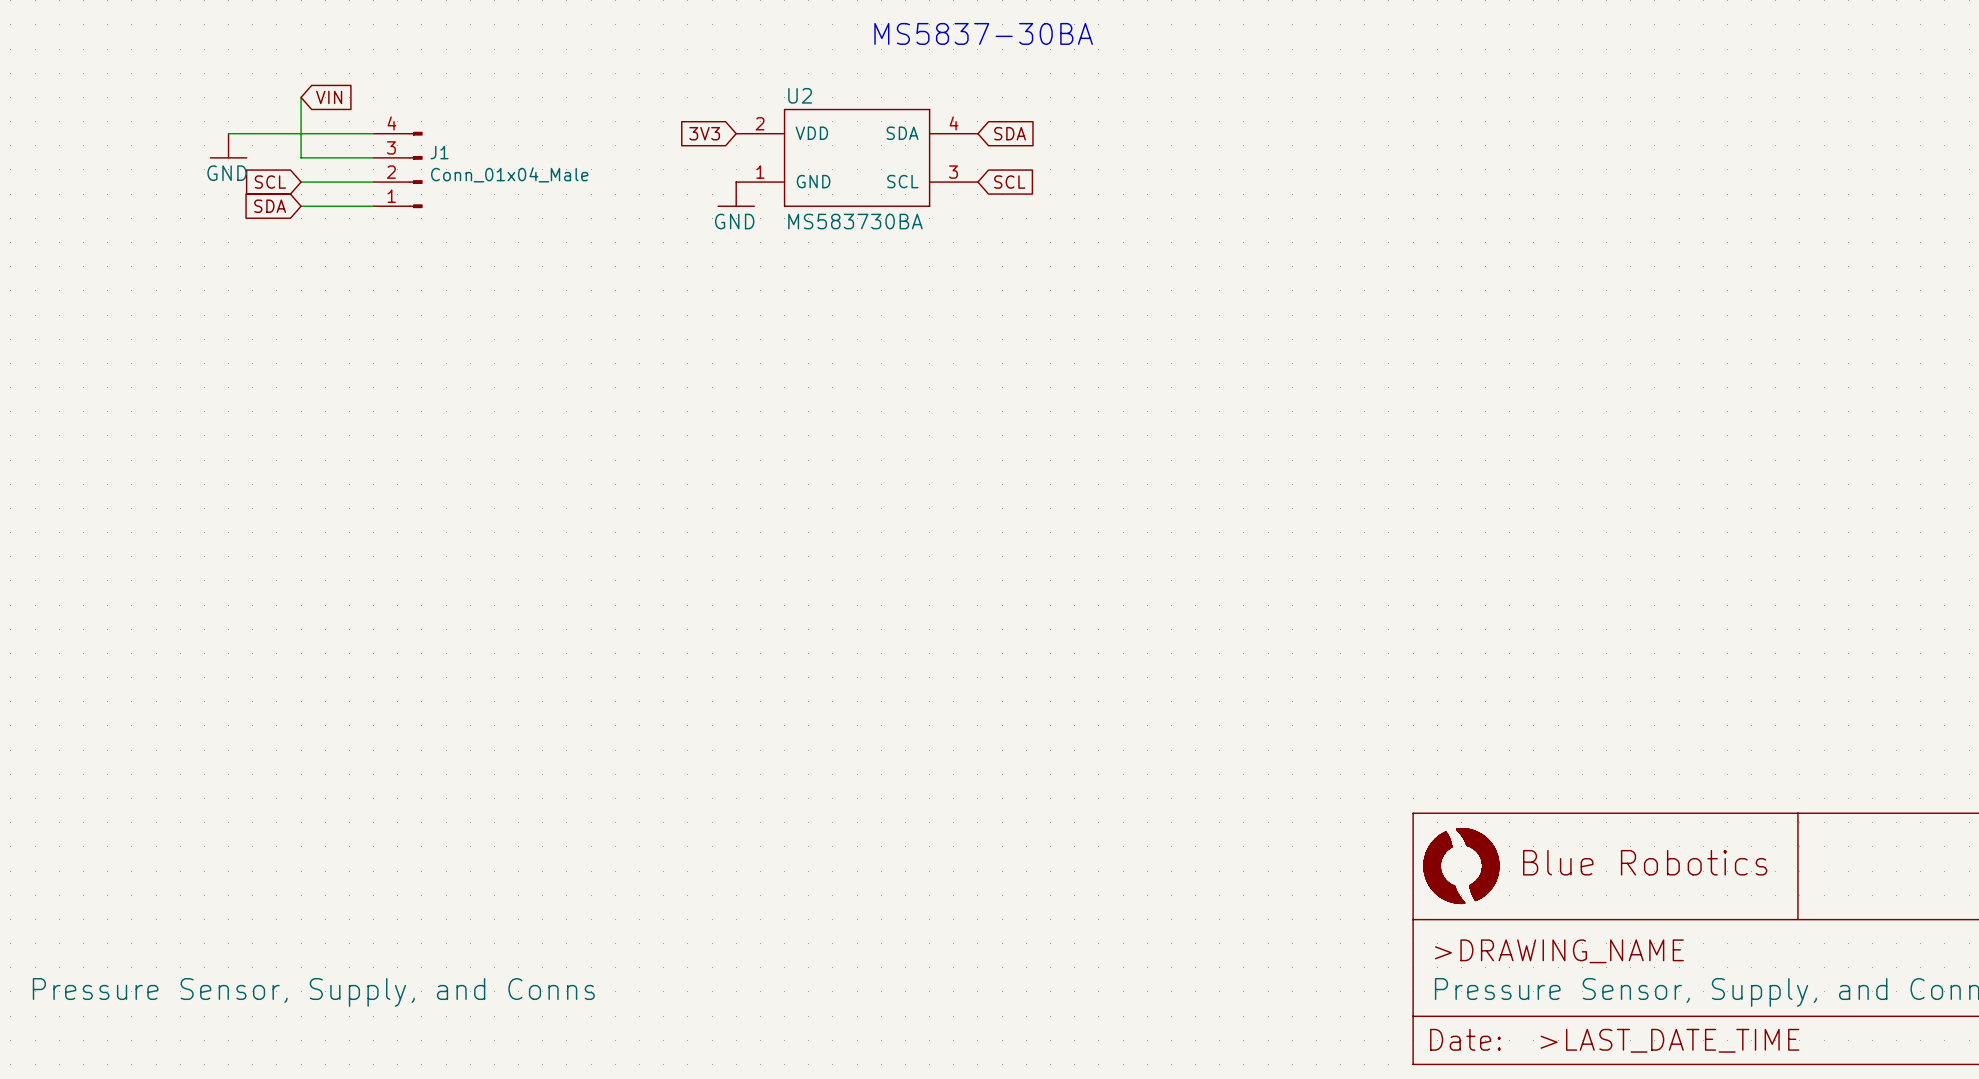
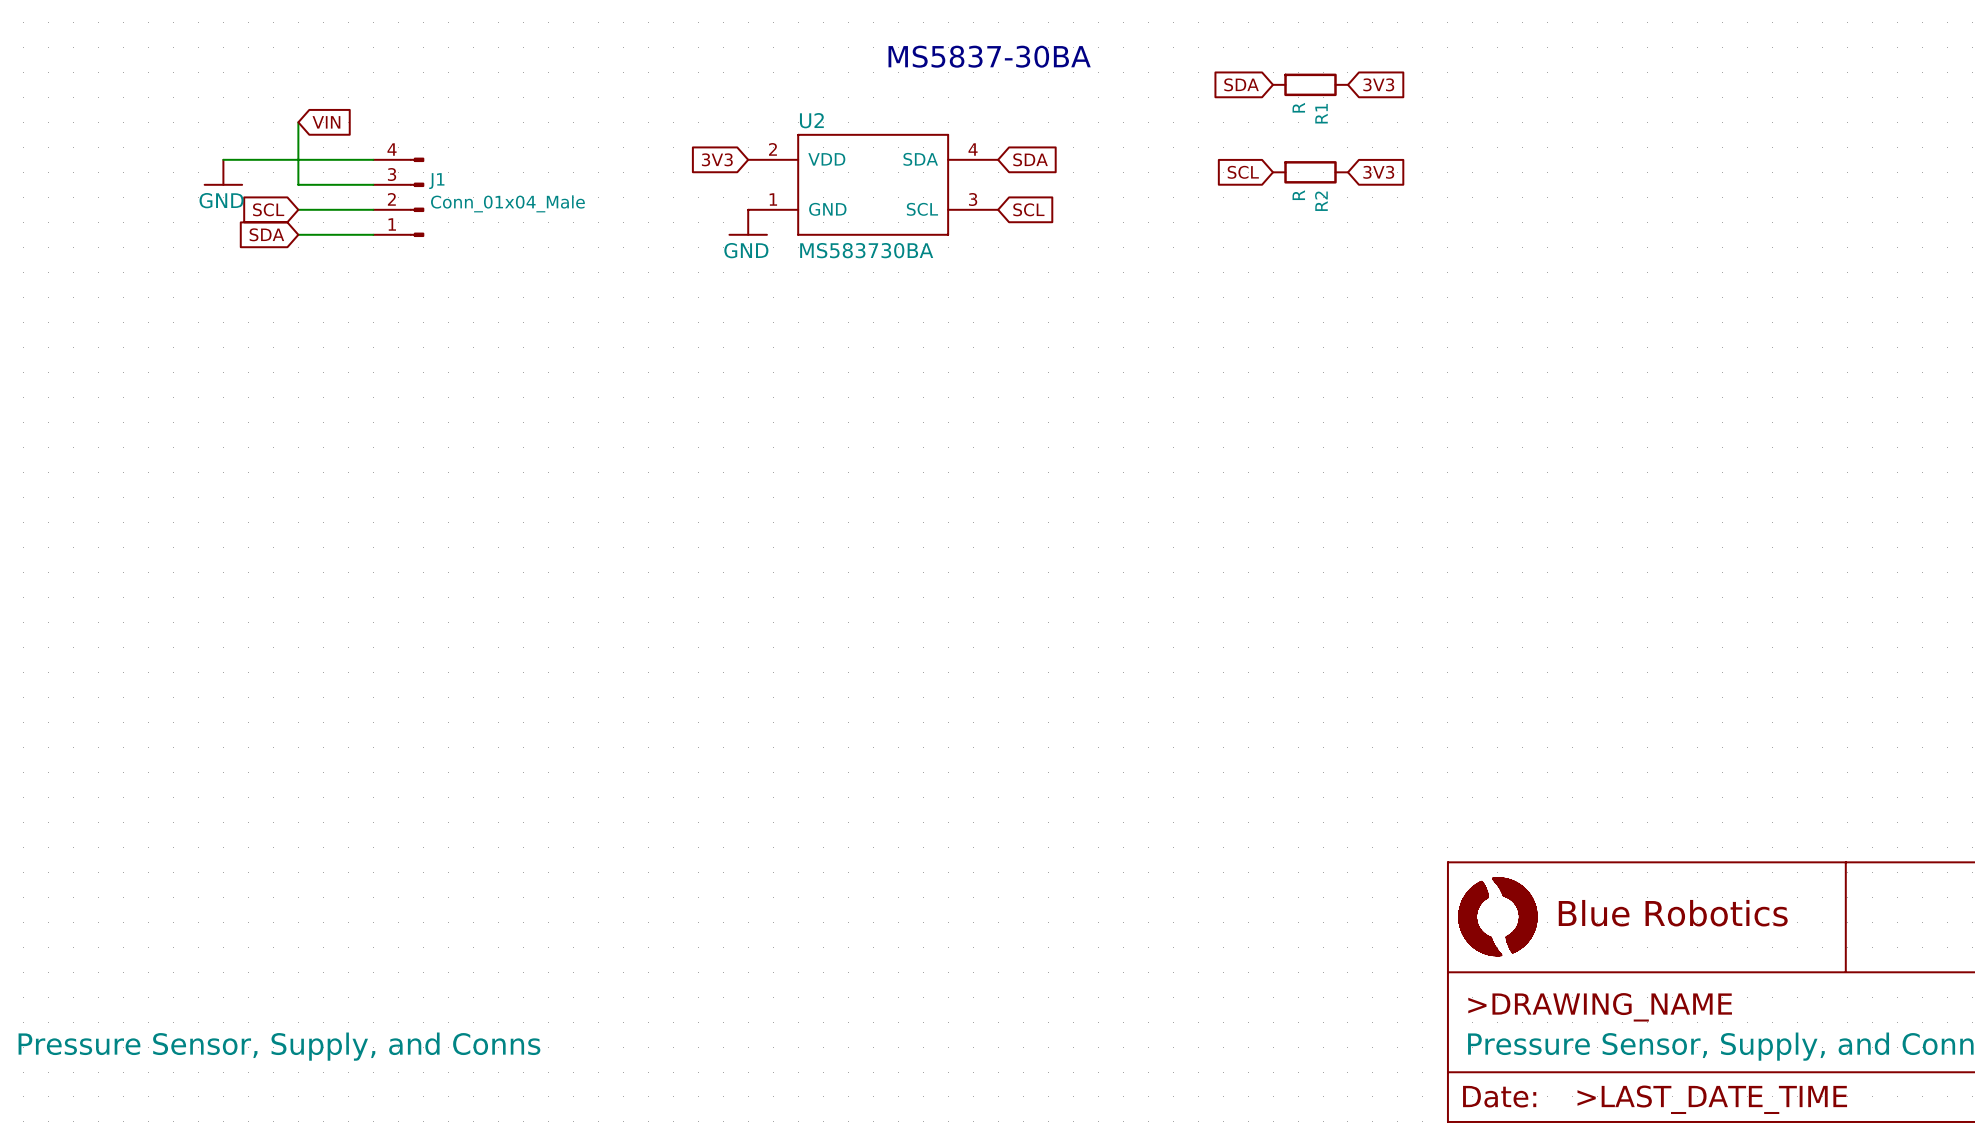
global label: none -> SDA (1241, 84)
R1: none -> R (1310, 84)
global label: none -> 3V3 (1378, 84)
global label: none -> SCL (1243, 172)
R2: none -> R (1310, 172)
global label: none -> 3V3 (1378, 172)

